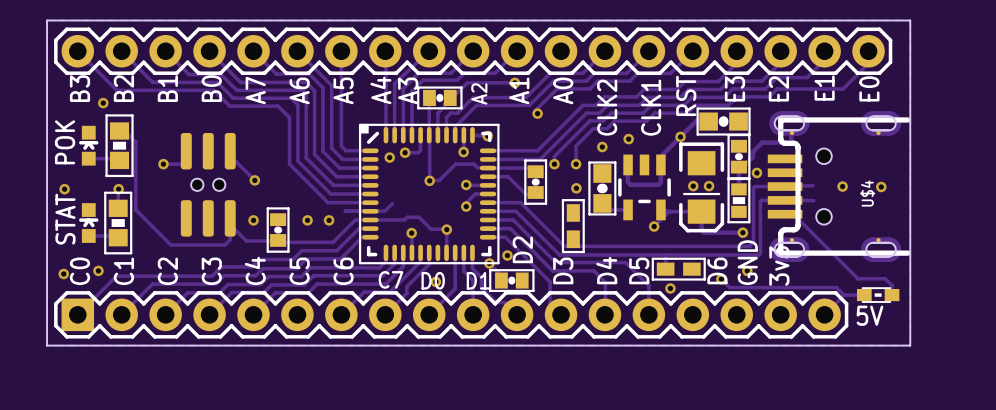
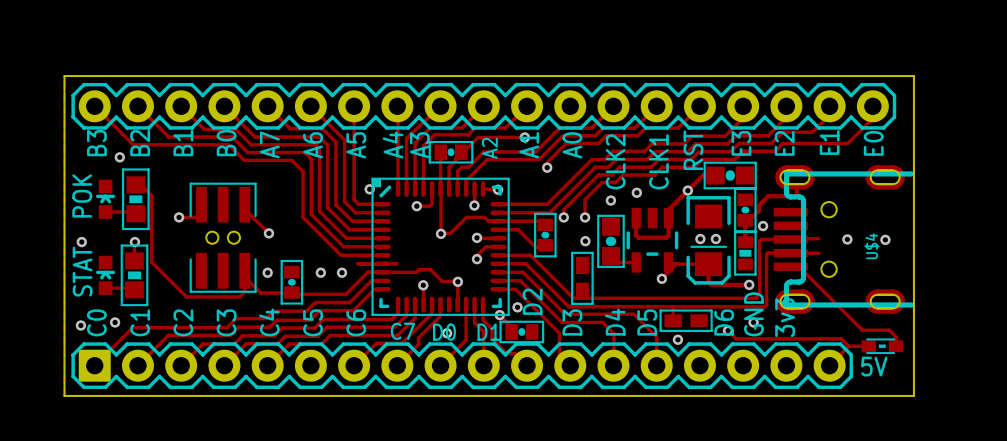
part footprint: [180, 132, 236, 237] -> [189, 182, 257, 293]
via position: (389, 157) -> (369, 189)
track: (392, 203) (384, 211) -> none

